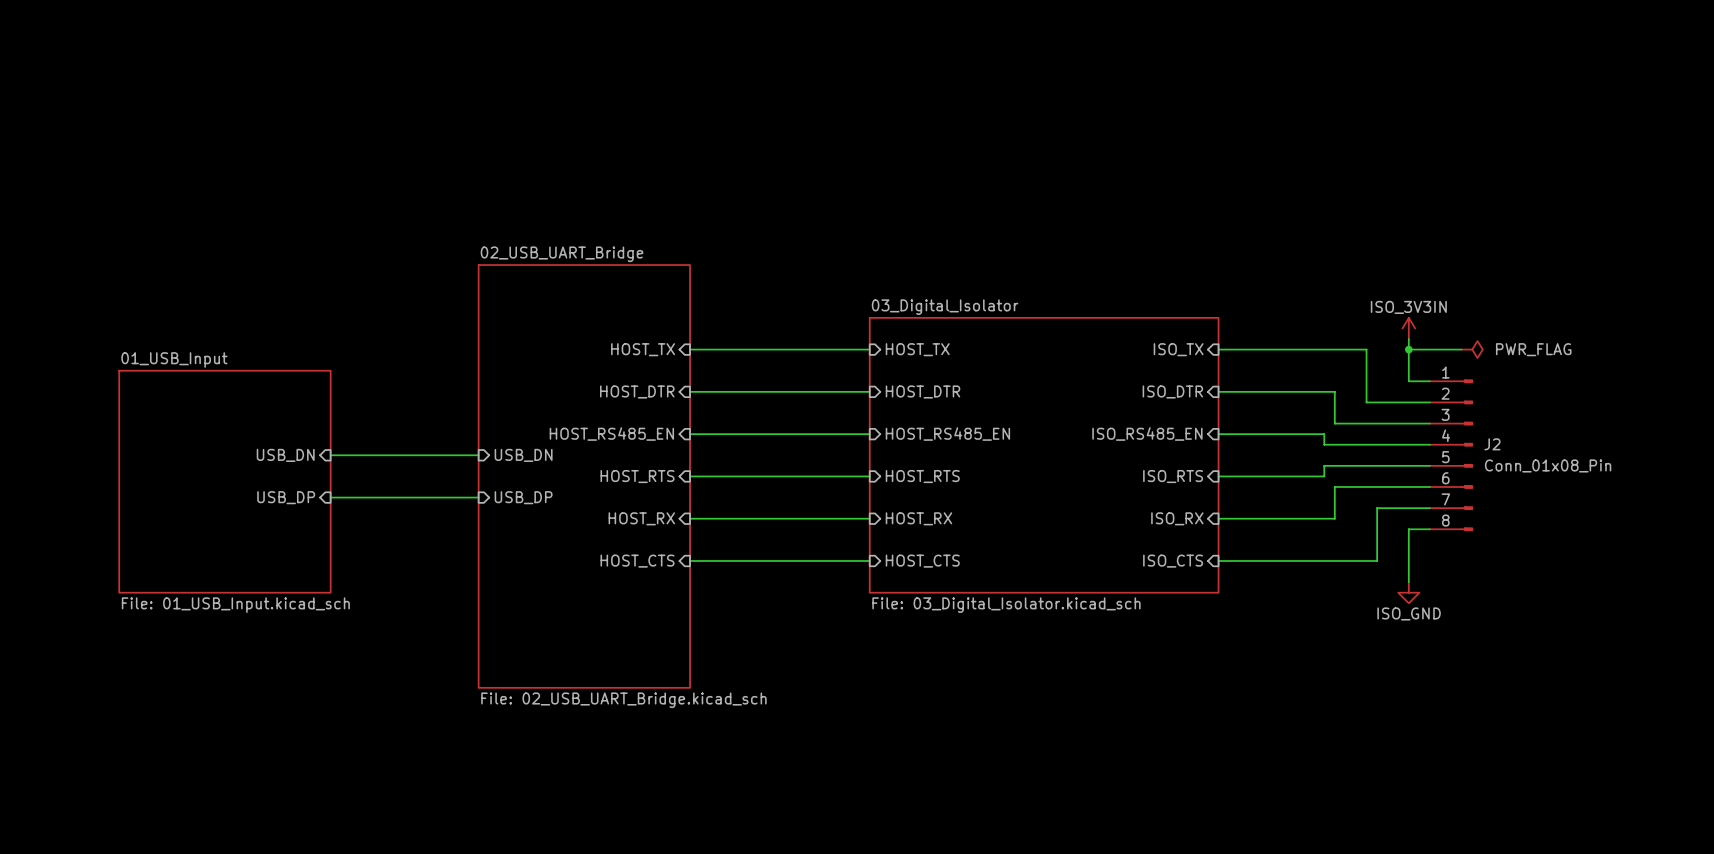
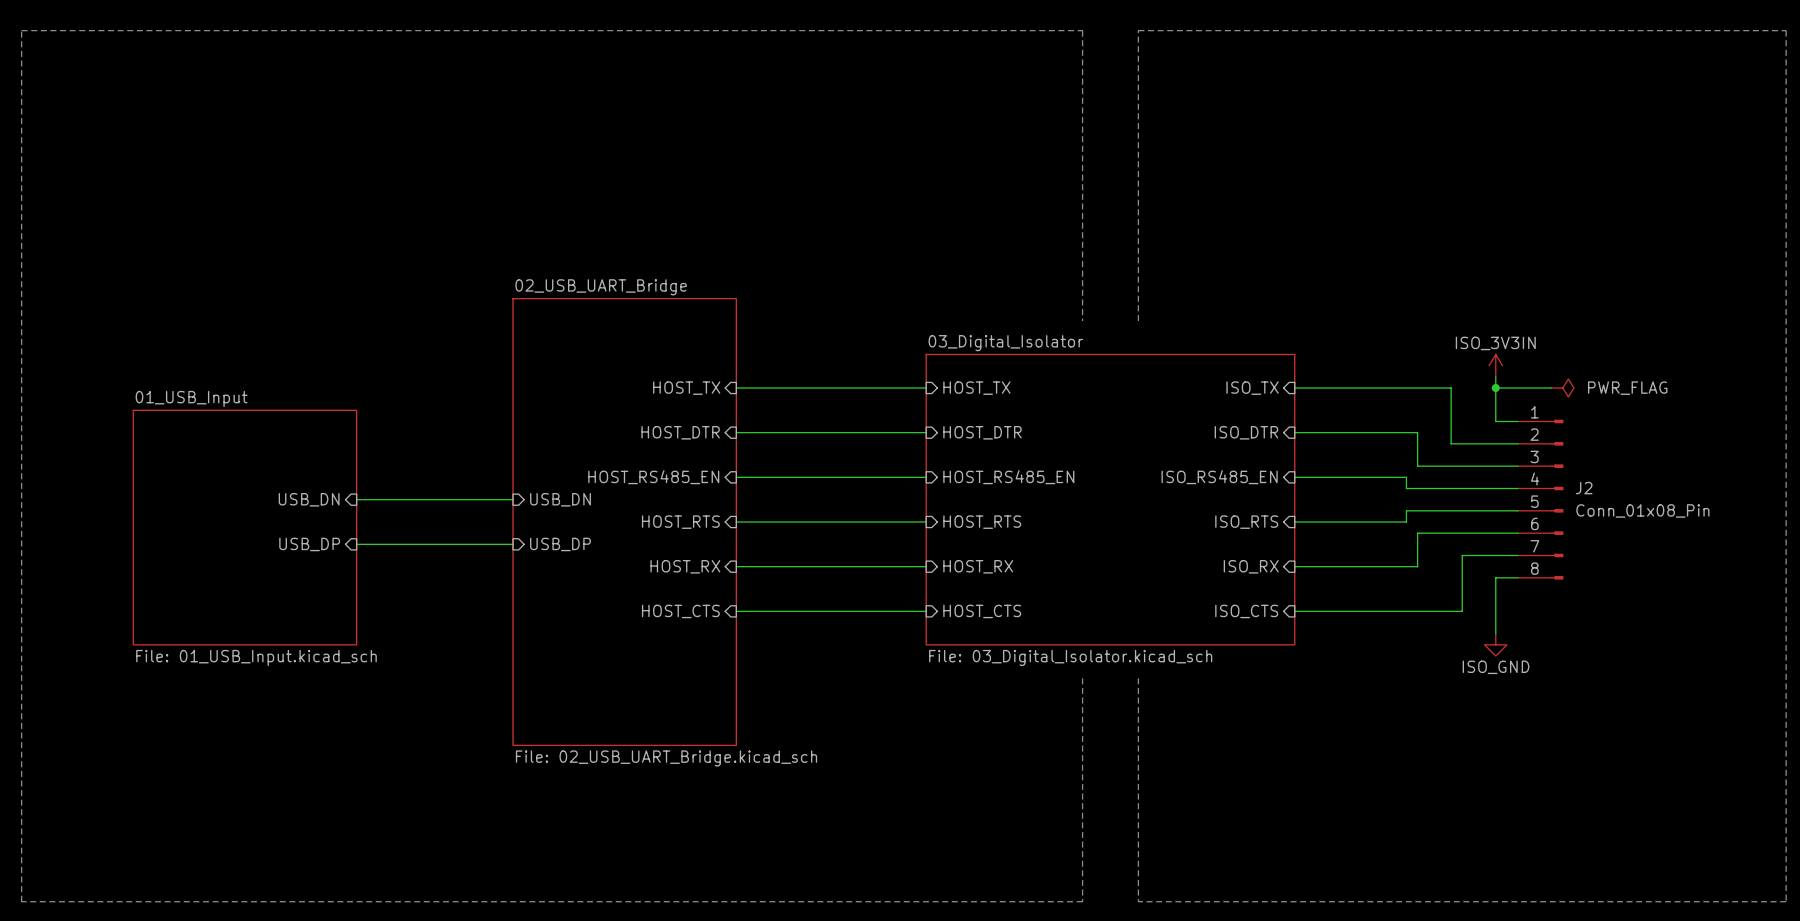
line: none -> (1082, 320) (1082, 30) (21, 30) (21, 901) (1082, 901) (1082, 678)
line: none -> (1138, 320) (1138, 30) (1786, 30) (1786, 901) (1138, 901) (1138, 678)

